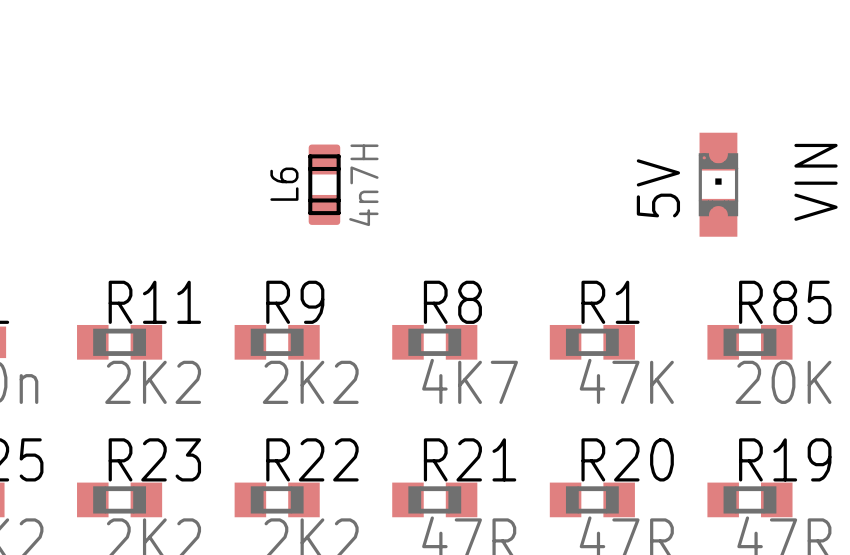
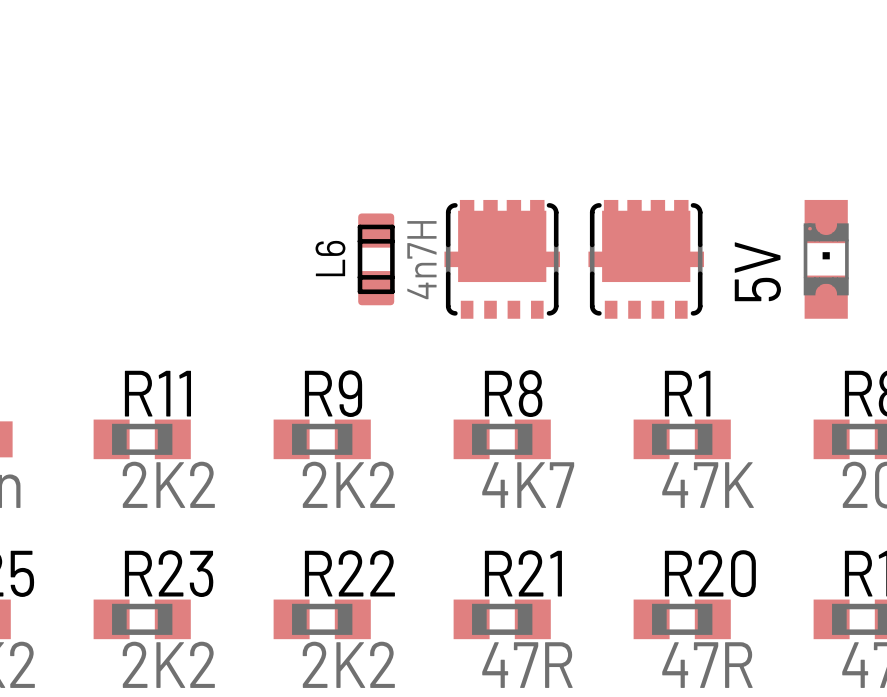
part: none -> (502, 259)
part: none -> (646, 259)

